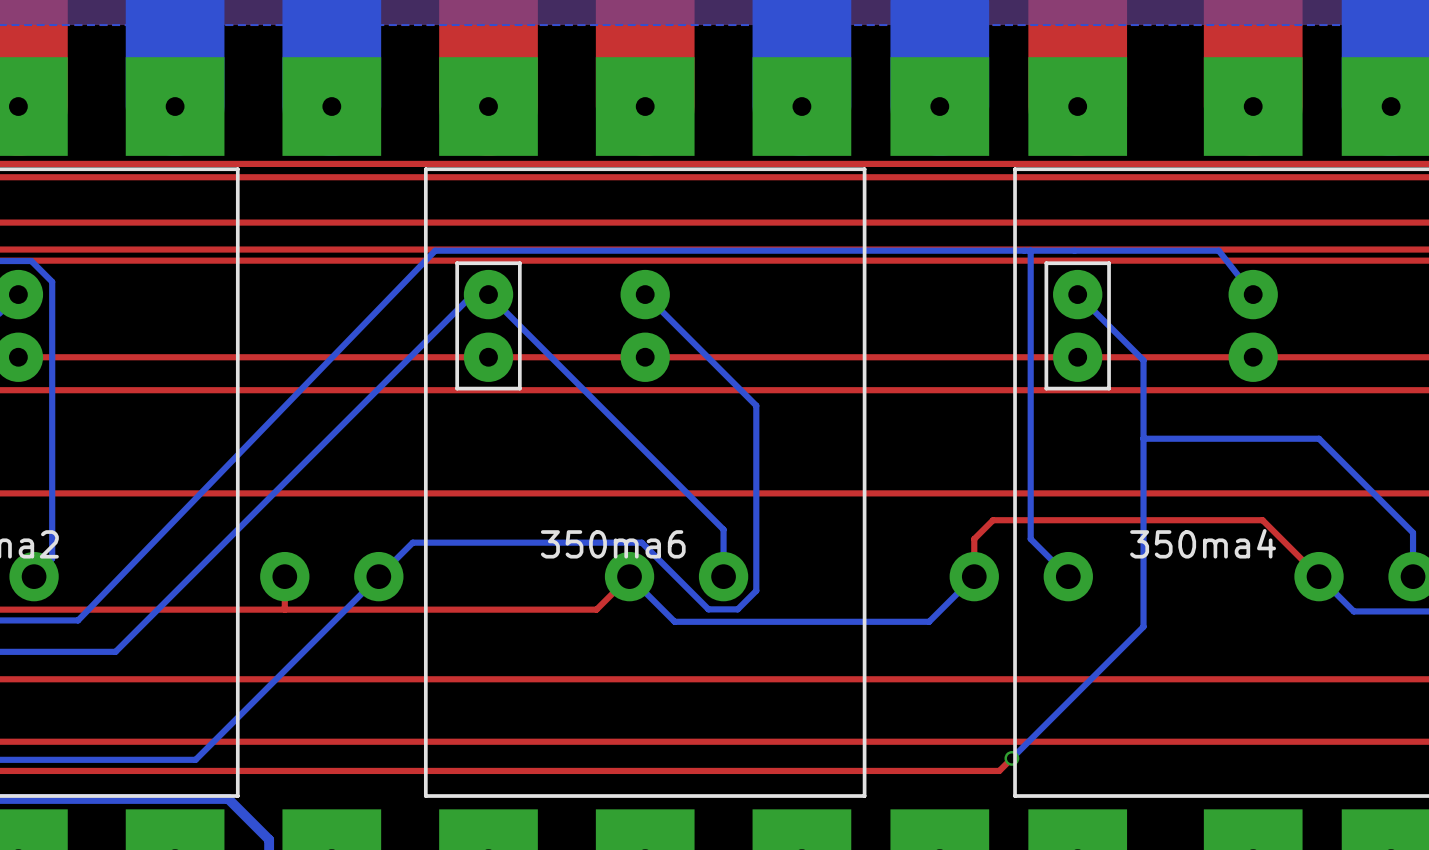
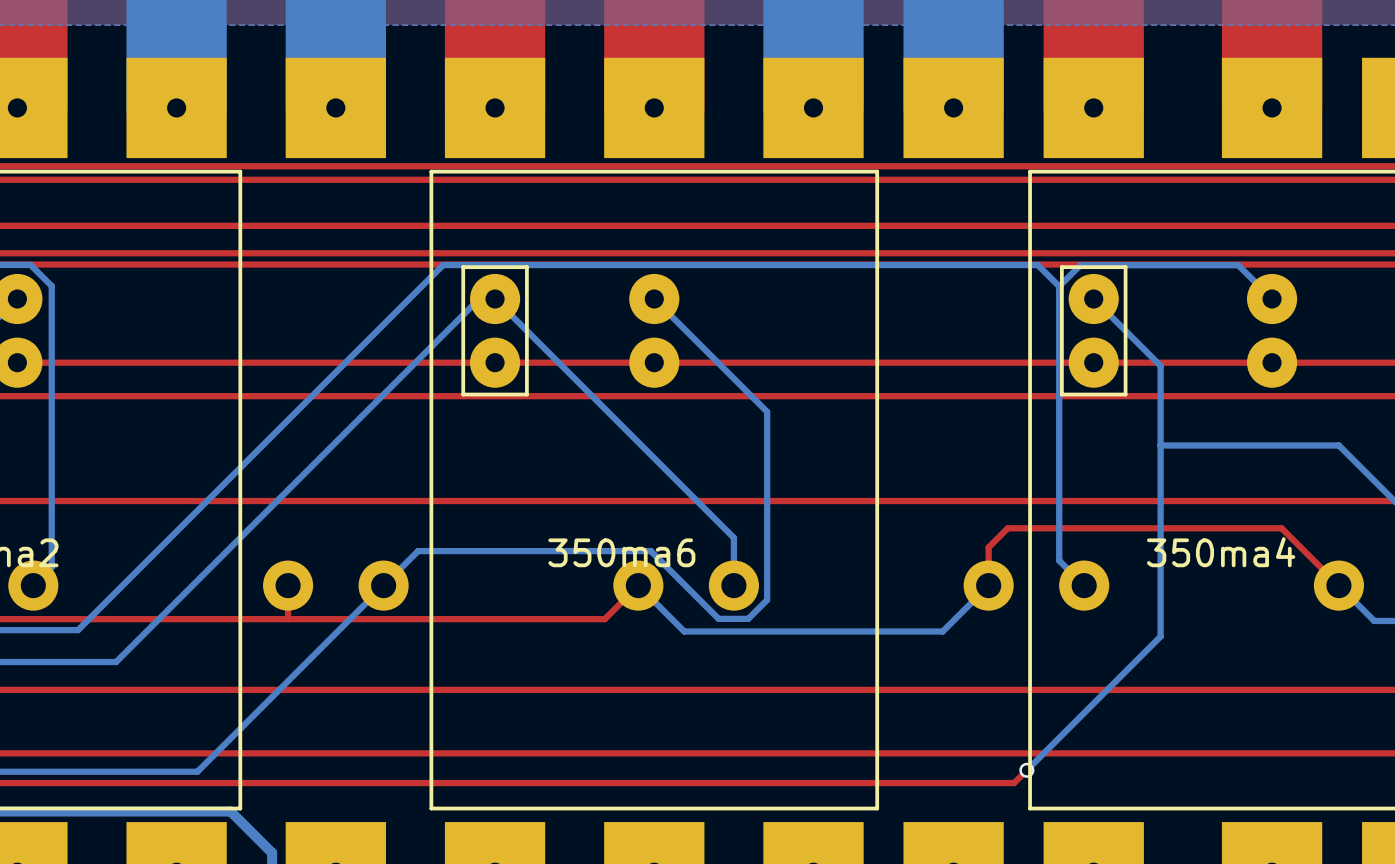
bottom track: (1030, 250) (1030, 539) (1043, 552) -> (1059, 286) (1059, 560)
bottom track: none -> (1059, 286) (1080, 265) (1238, 265) (1272, 299)
bottom track: (1253, 294) (1218, 250) (435, 250) (78, 620) -> (1059, 286) (1037, 265) (443, 265) (78, 630)

